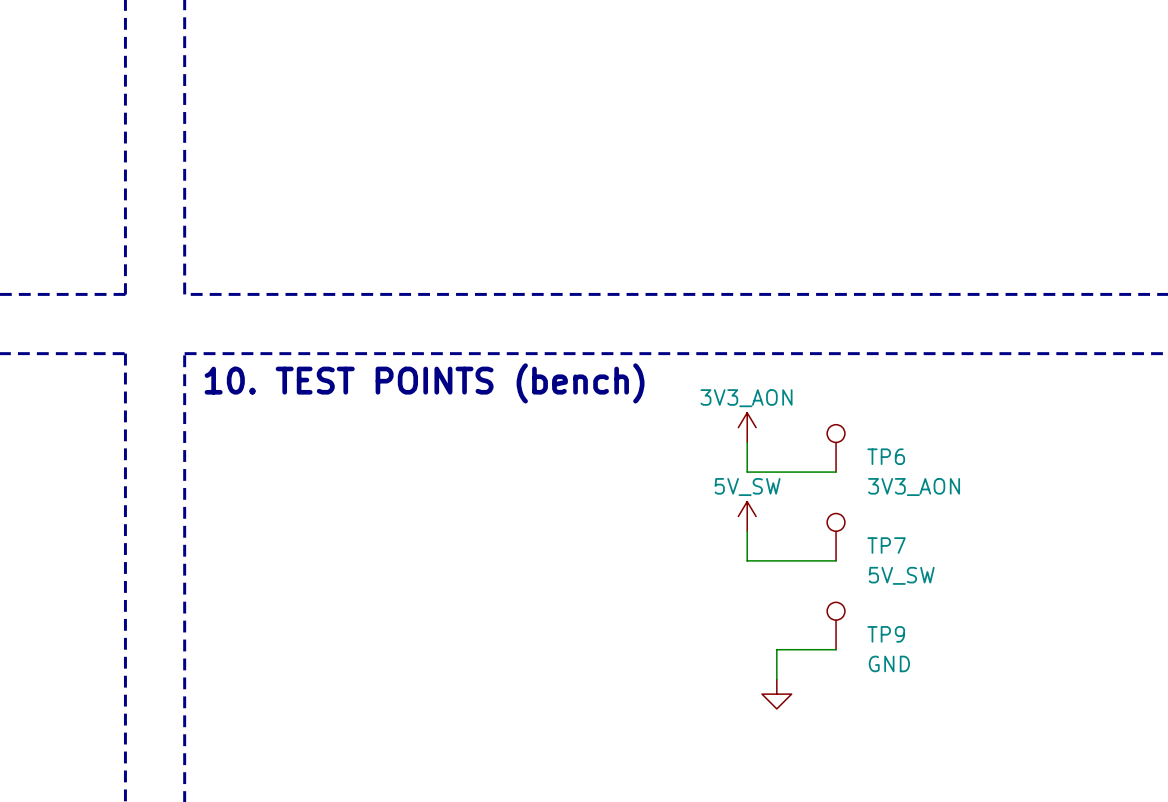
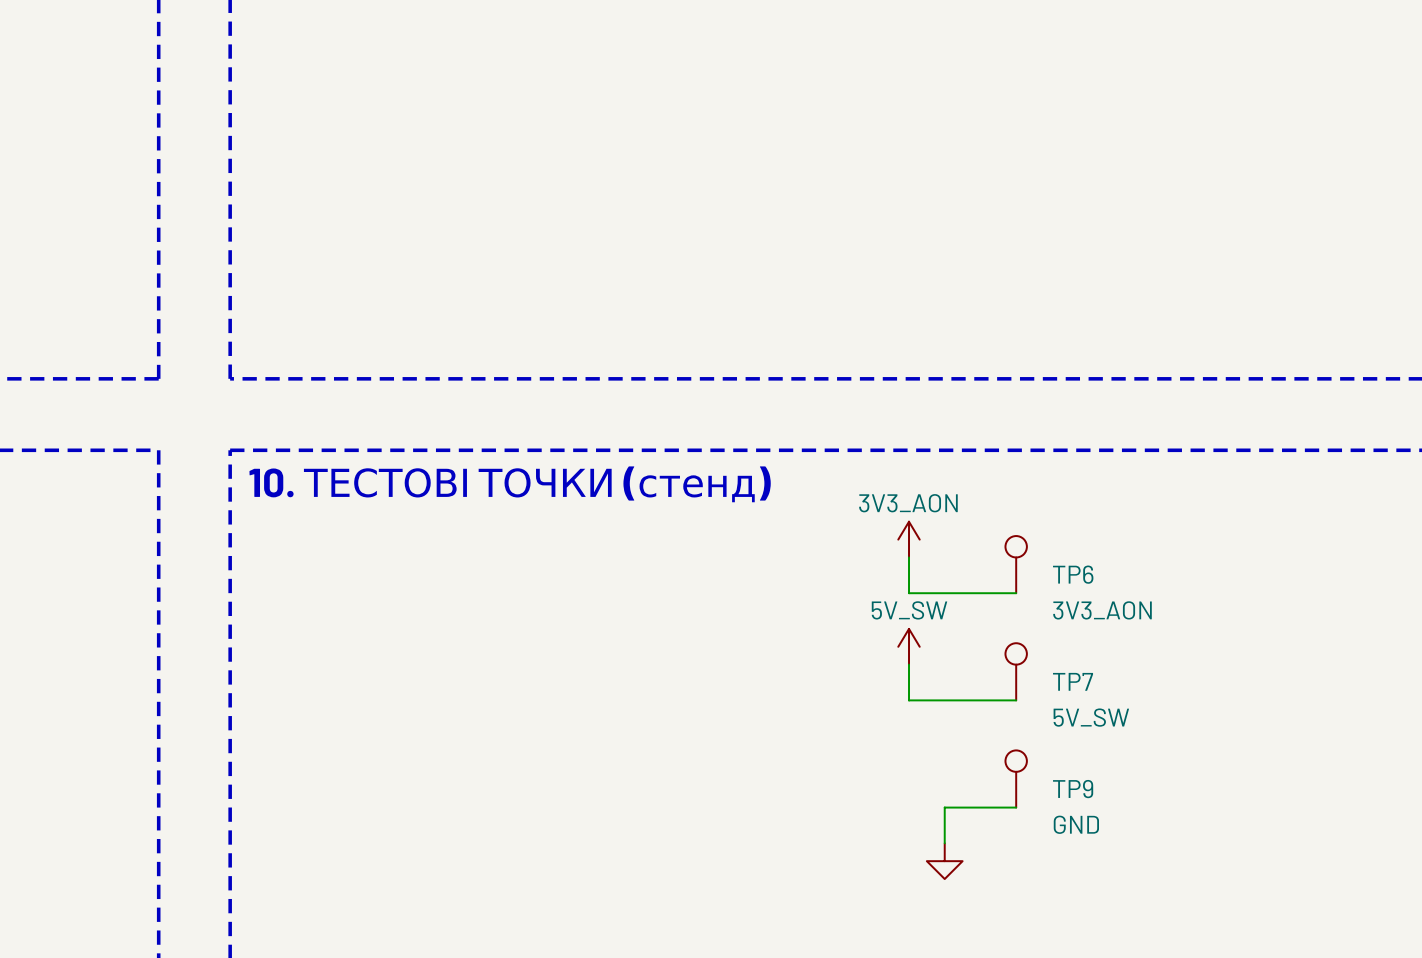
text: 10. TEST POINTS (bench) (424, 383) -> 10. ТЕСТОВІ ТОЧКИ (стенд) (510, 484)

